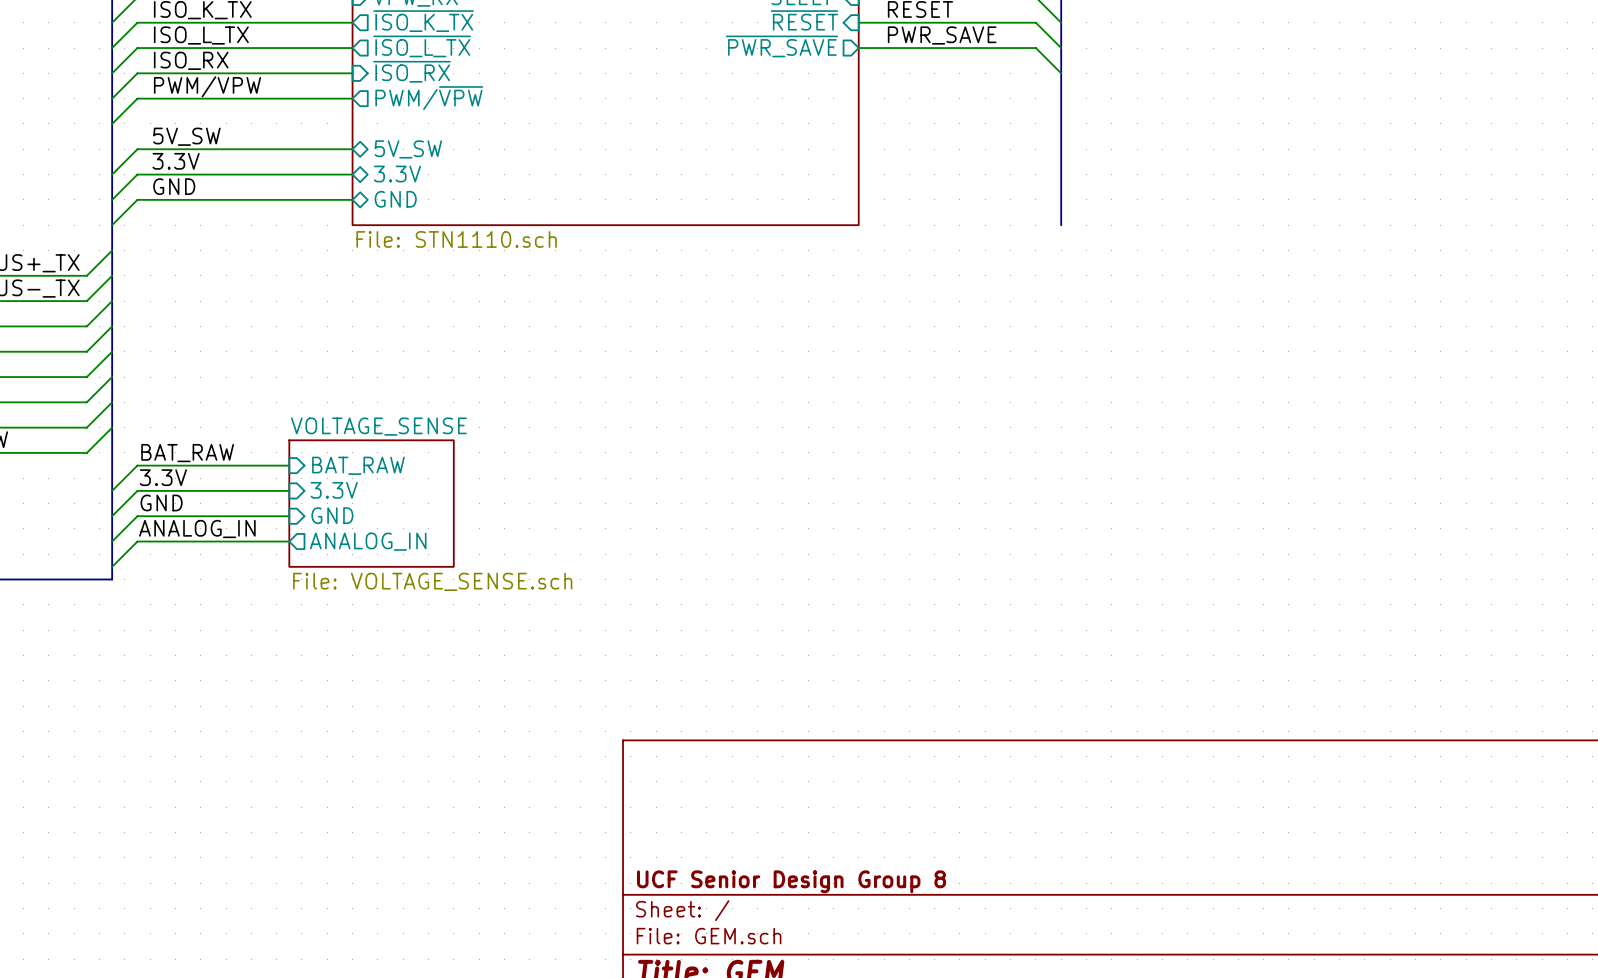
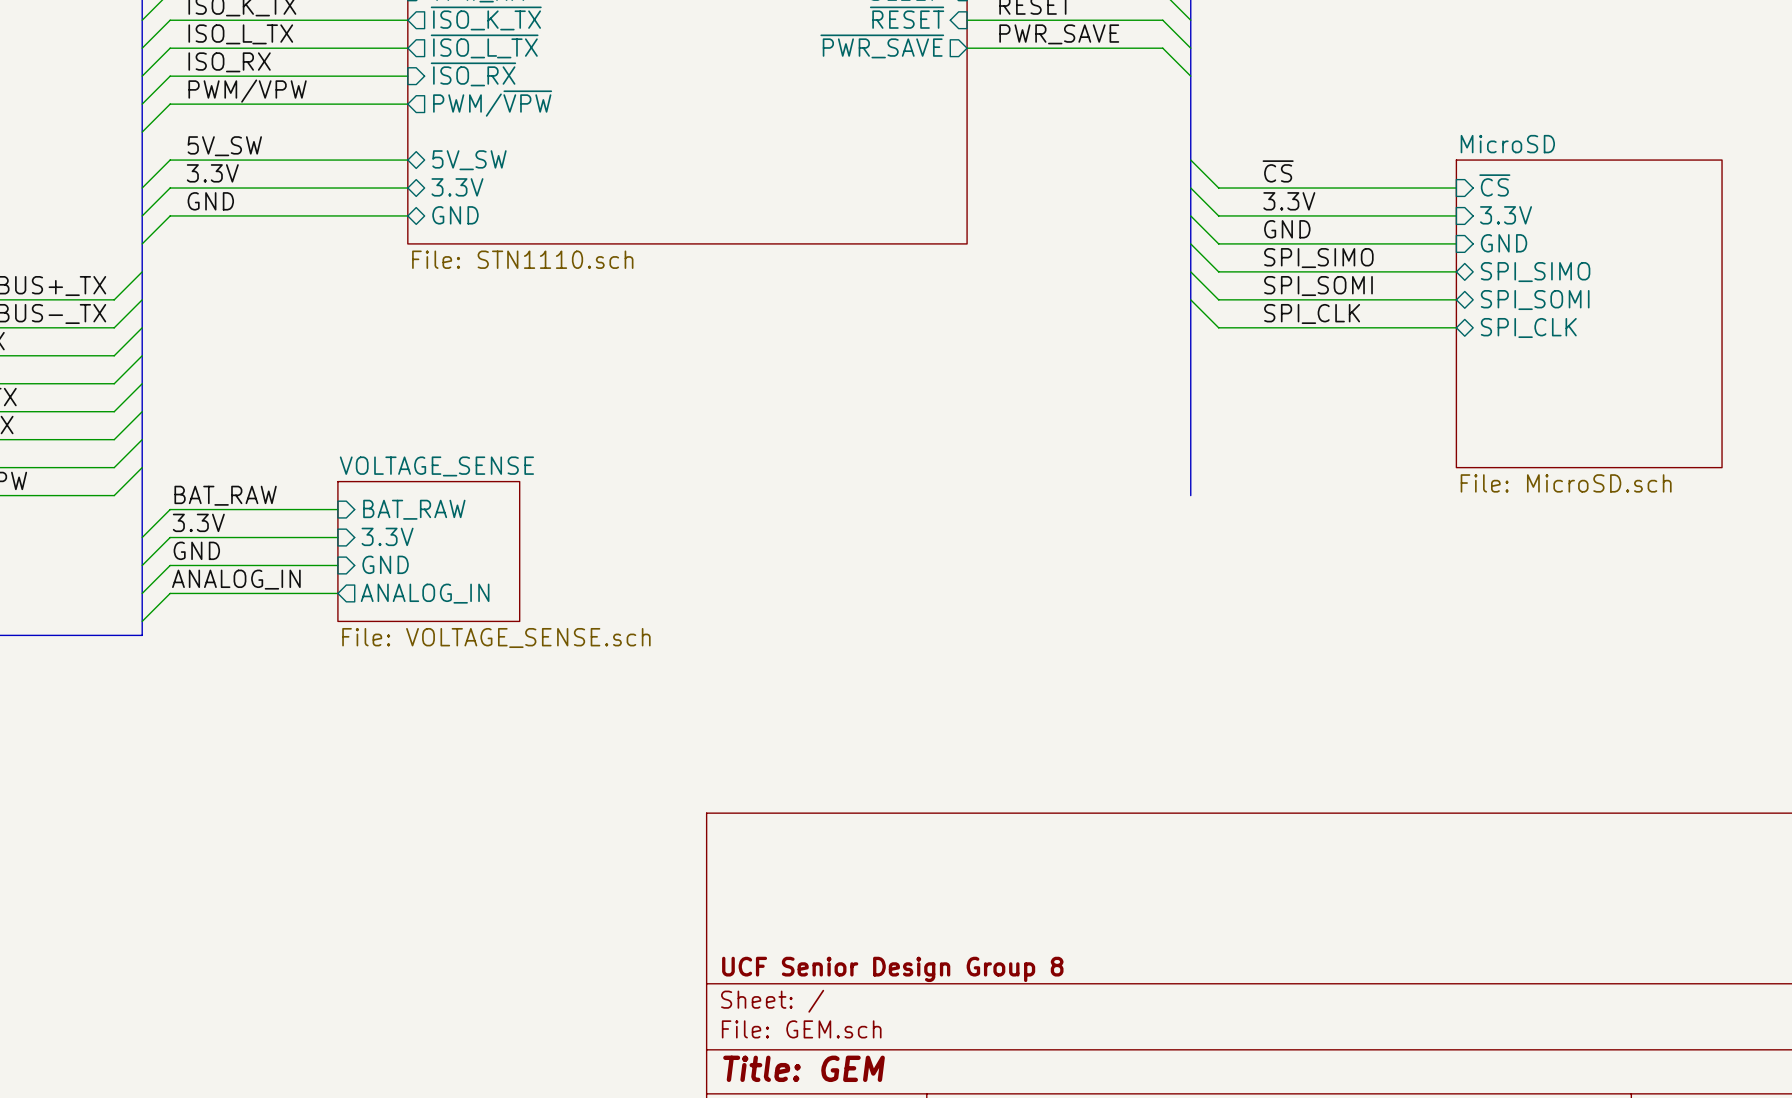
wire: none -> (1190, 160) (1218, 188) (1456, 188)
label: none -> ~{CS} (1278, 171)
sheet pin: none -> ~{CS} (1494, 185)
wire: none -> (1190, 188) (1218, 215) (1456, 215)
label: none -> 3.3V (1289, 201)
wire: none -> (1190, 215) (1218, 243) (1456, 243)
sheet pin: none -> 3.3V (1506, 215)
label: none -> GND (1287, 229)
sheet pin: none -> GND (1504, 243)
wire: none -> (1190, 243) (1218, 271) (1456, 271)
bus: none -> (1190, 243) (1190, 495)
label: none -> SPI_SIMO (1318, 258)
wire: none -> (1190, 271) (1218, 299) (1456, 299)
sheet pin: none -> SPI_SIMO (1535, 272)
label: none -> SPI_SOMI (1318, 286)
wire: none -> (1190, 299) (1218, 327) (1456, 327)
sheet pin: none -> SPI_SOMI (1535, 300)
label: none -> SPI_CLK (1312, 313)
sheet MicroSD: none -> File: MicroSD.sch (1589, 313)
sheet pin: none -> SPI_CLK (1528, 327)

